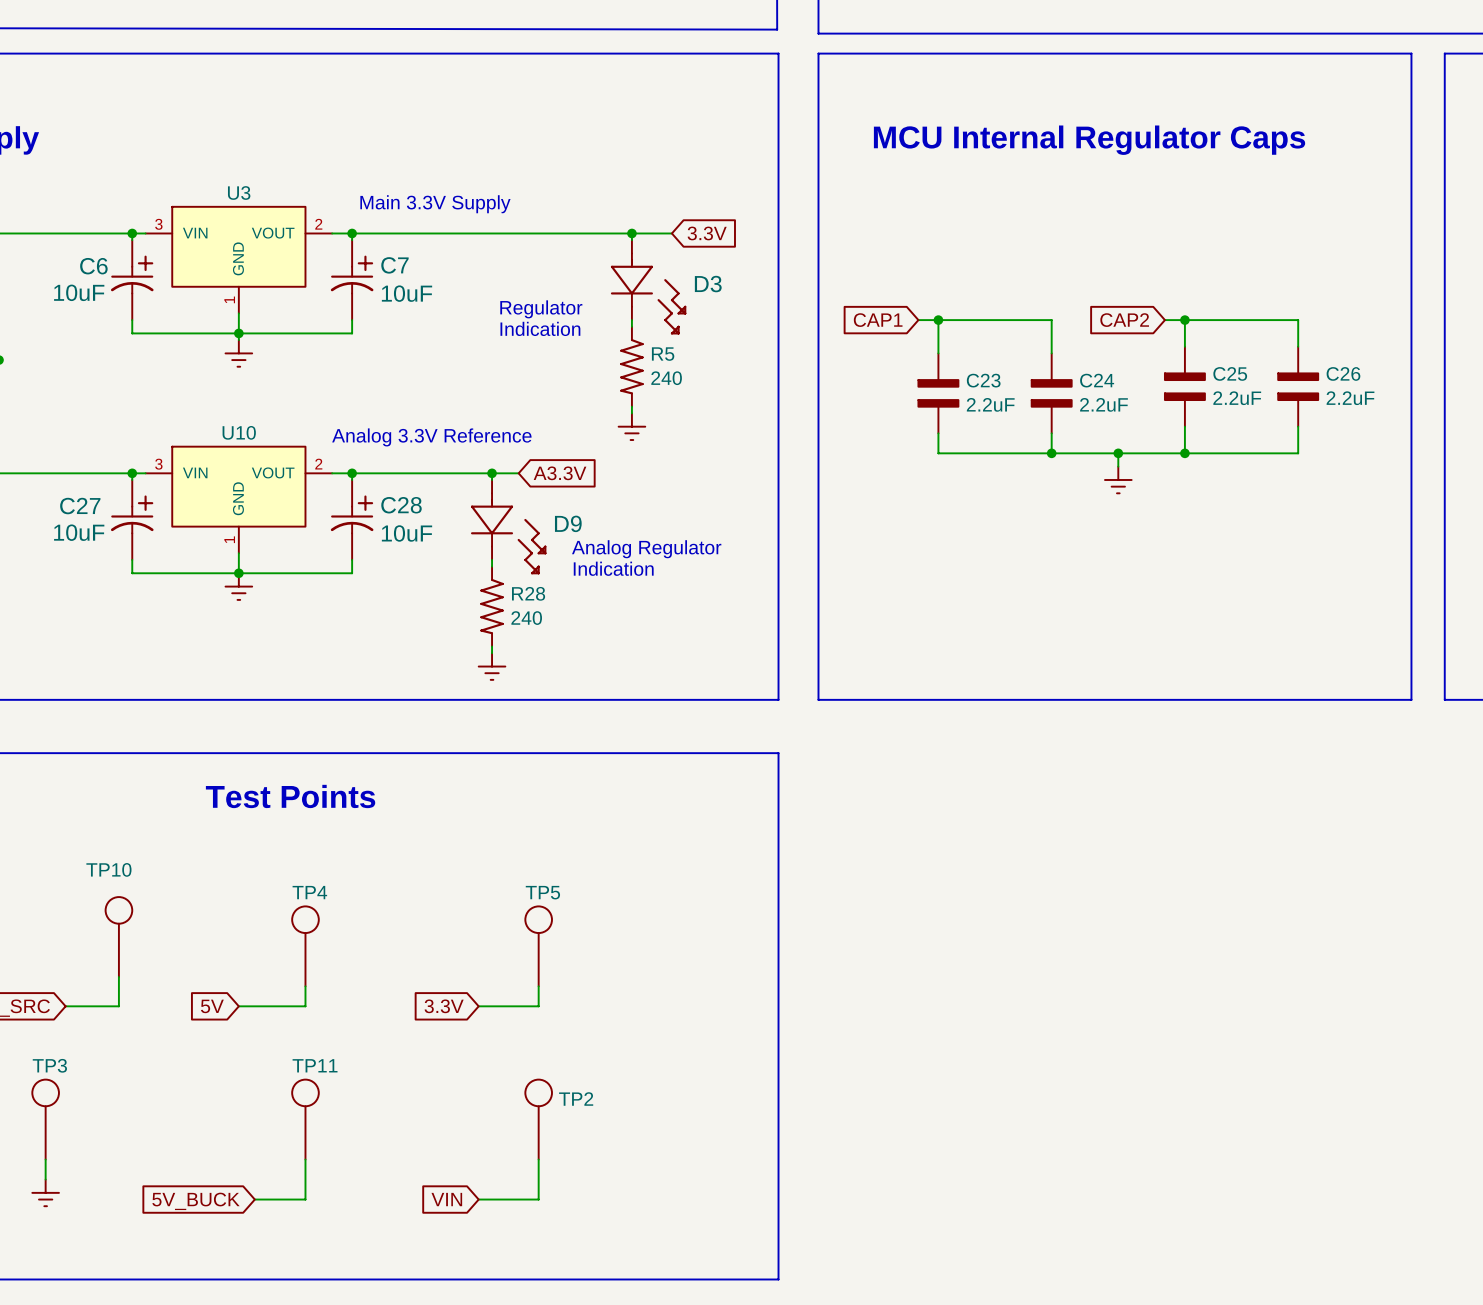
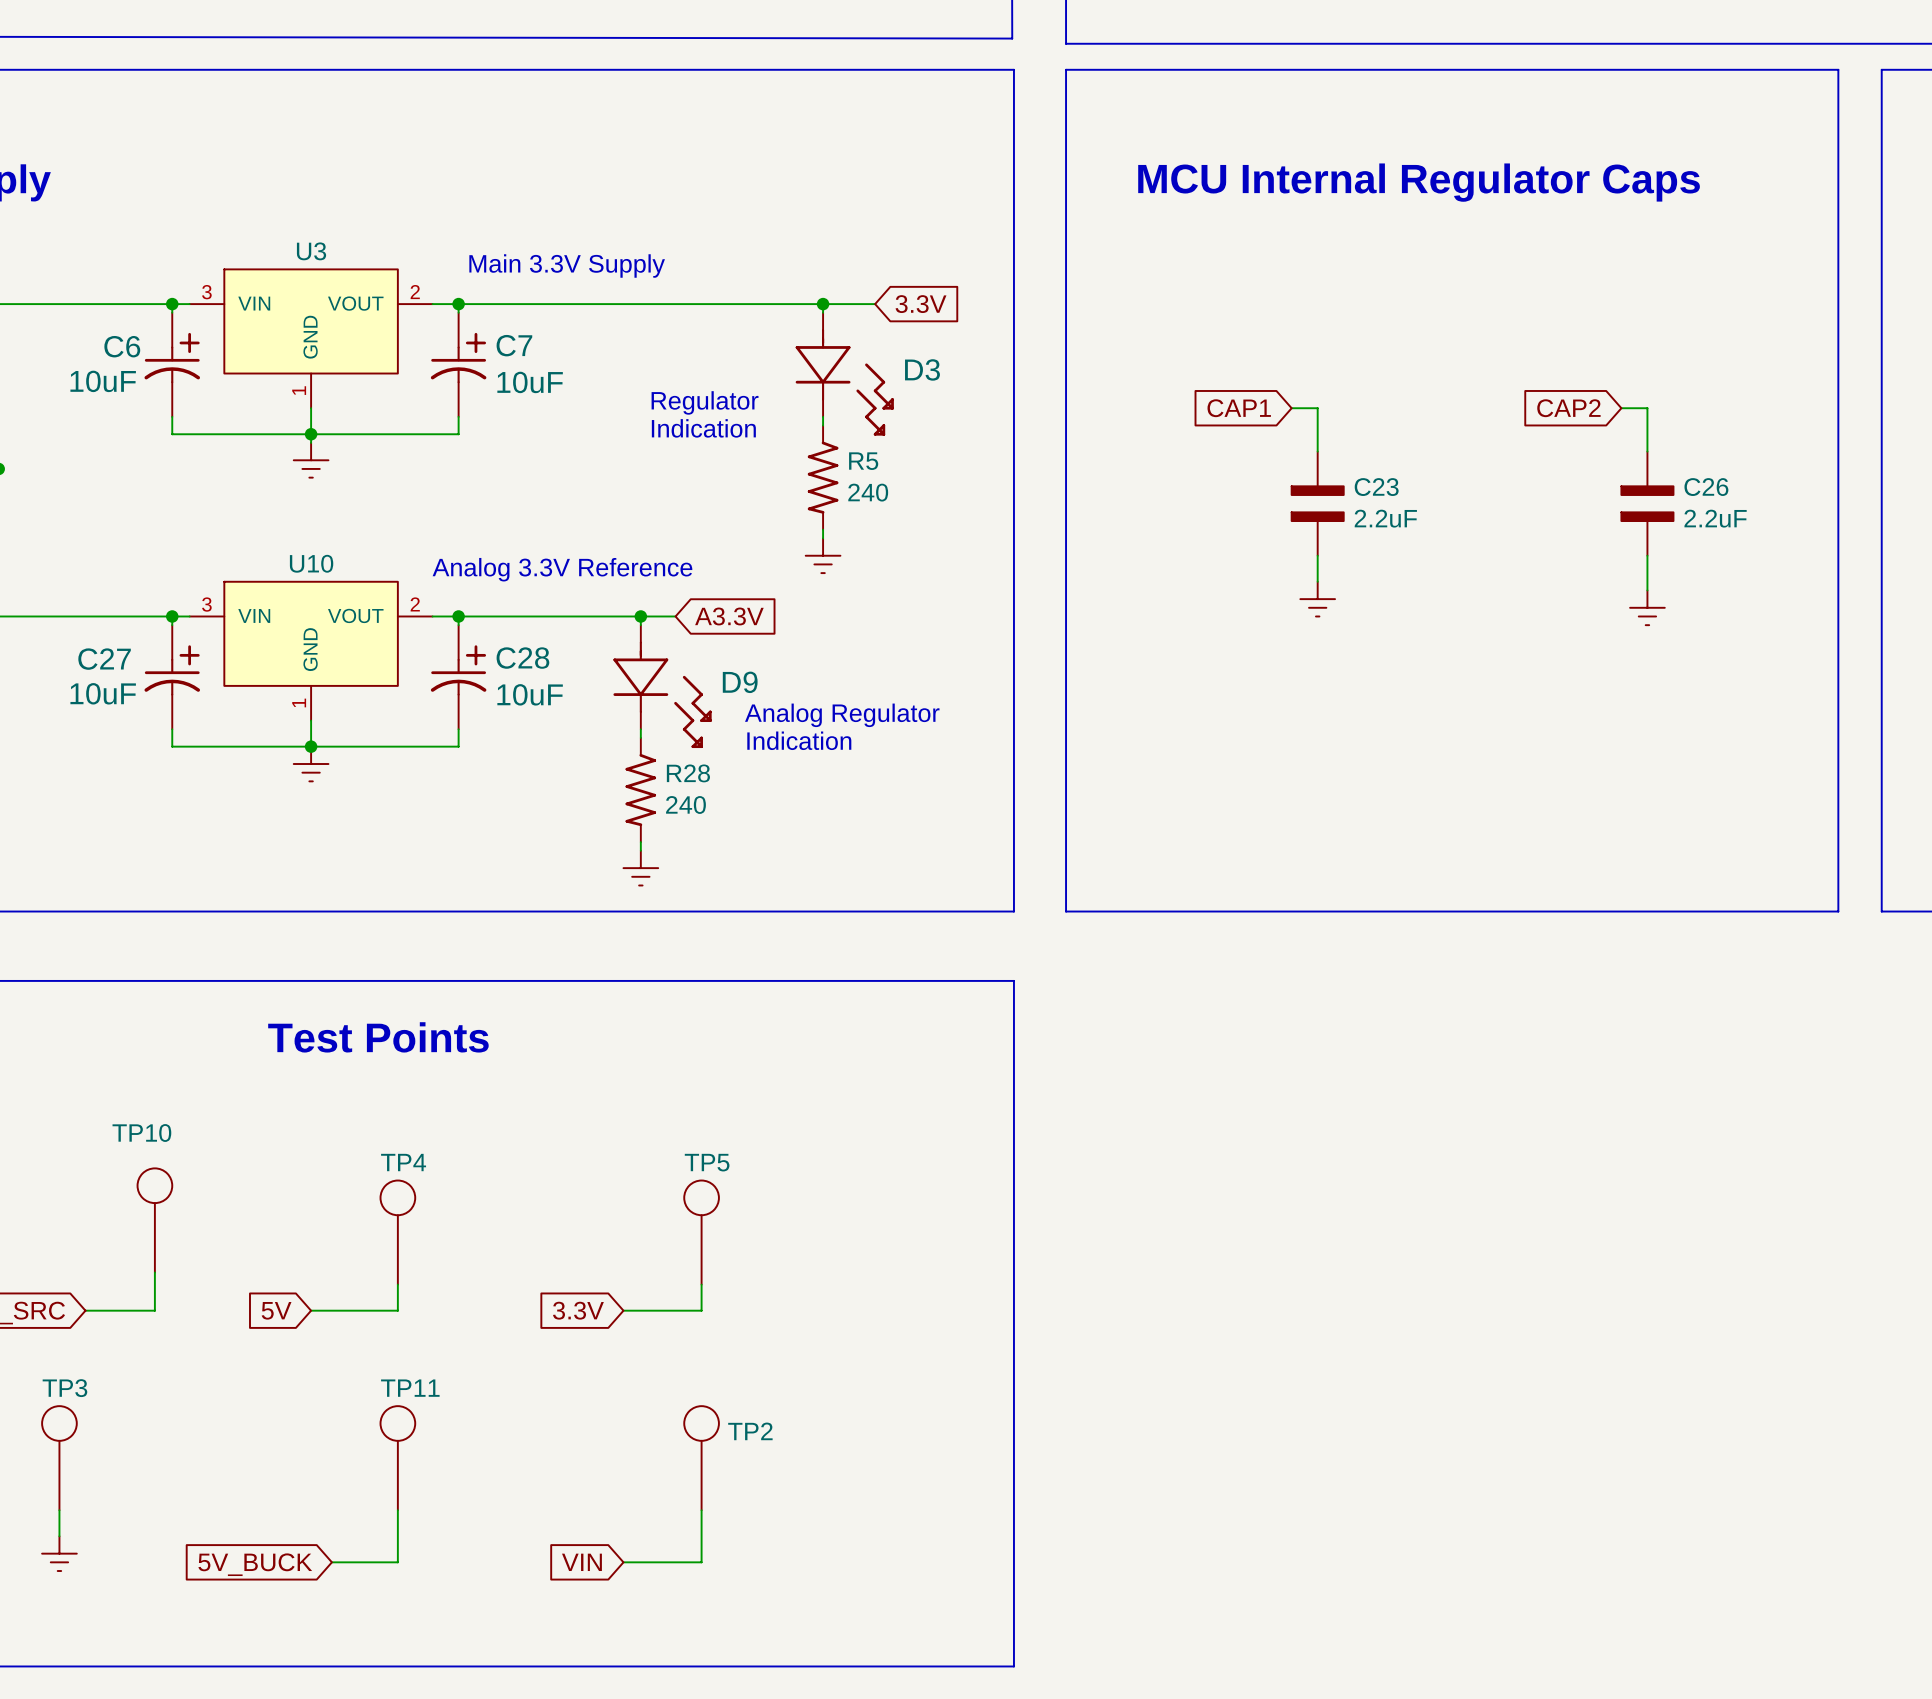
wire: none -> (1291, 408) (1317, 408) (1317, 451)
wire: none -> (1621, 408) (1647, 408) (1647, 451)
global label position: CAP1 (878, 320) -> CAP1 (1239, 408)
wire: (918, 320) (1051, 320) (1051, 353) -> none
wire: (938, 320) (938, 353) -> none
junction: (938, 320) -> none
global label position: CAP2 (1124, 320) -> CAP2 (1568, 408)
wire: (1164, 320) (1298, 320) (1298, 346) -> none
wire: (1184, 320) (1184, 346) -> none
junction: (1184, 320) -> none
C25: 2.2uF (1184, 386) -> none
C26 position: (1298, 386) -> (1647, 503)
C23 position: (938, 393) -> (1317, 503)
C24: 2.2uF (1051, 393) -> none
wire: (1184, 426) (1184, 453) -> (1647, 555) (1647, 590)
wire: (1298, 426) (1298, 453) (938, 453) (938, 433) -> none
wire: (1051, 433) (1051, 453) -> (1317, 555) (1317, 581)
junction: (1051, 453) -> none
wire: (1118, 453) (1118, 466) -> none
junction: (1118, 453) -> none
junction: (1184, 453) -> none
power symbol: none -> (1317, 599)
power symbol: none -> (1647, 607)
power symbol: (1118, 479) -> none

